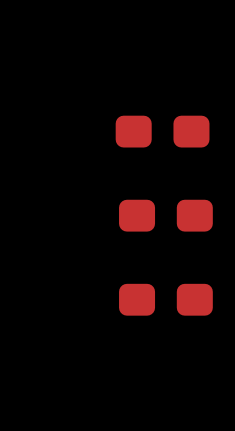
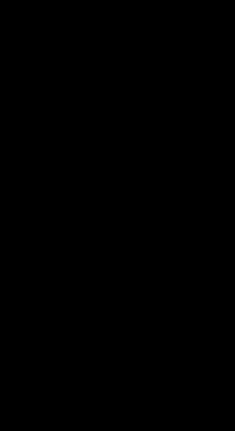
part: (162, 131) -> none
part: (165, 215) -> none
part: (165, 299) -> none

